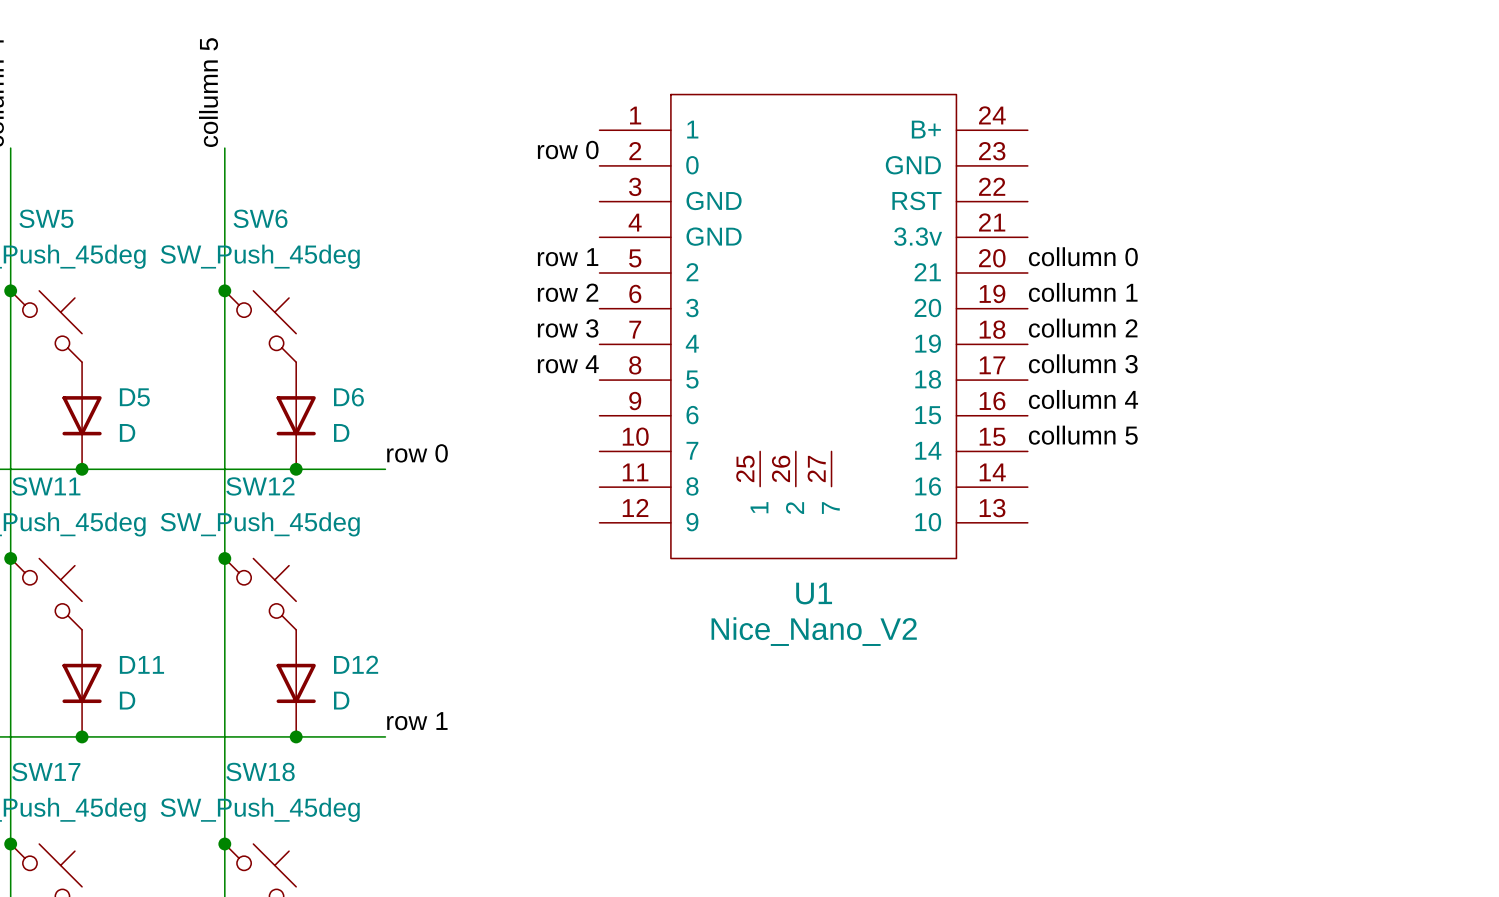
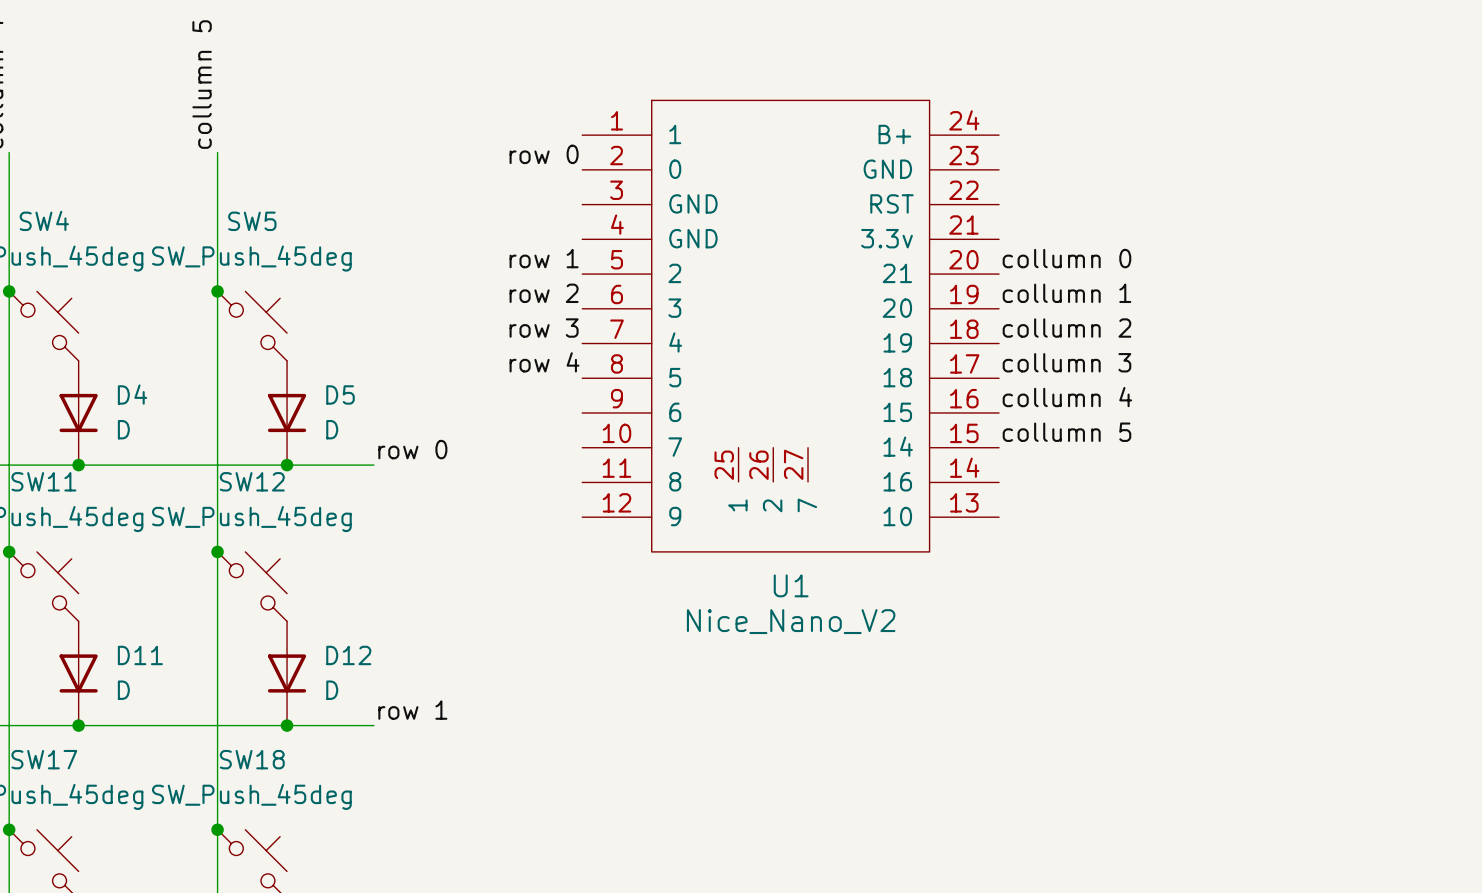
SW5 name: SW5 (46, 218) -> SW4 (44, 220)
SW6 name: SW6 (260, 218) -> SW5 (252, 221)
D5 name: D5 (134, 397) -> D4 (132, 394)
D6 name: D6 (348, 397) -> D5 (340, 394)

